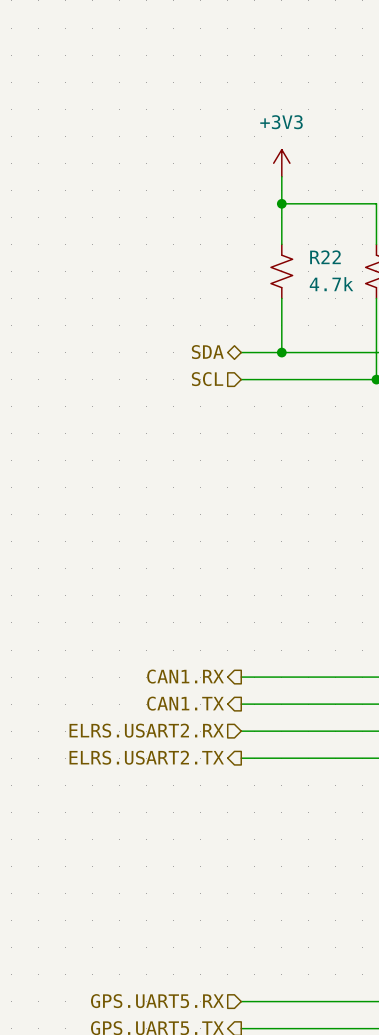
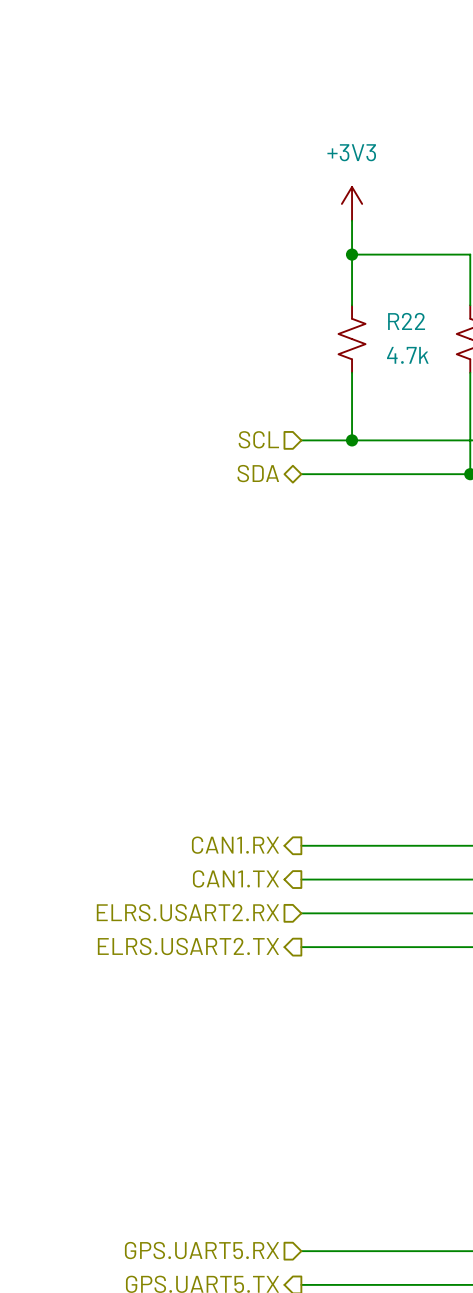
hierarchical label shape: bidirectional (207, 352) -> input (258, 439)
hierarchical label: SDA (207, 352) -> SCL (258, 439)
hierarchical label shape: input (207, 379) -> bidirectional (258, 473)
hierarchical label: SCL (207, 379) -> SDA (258, 473)

